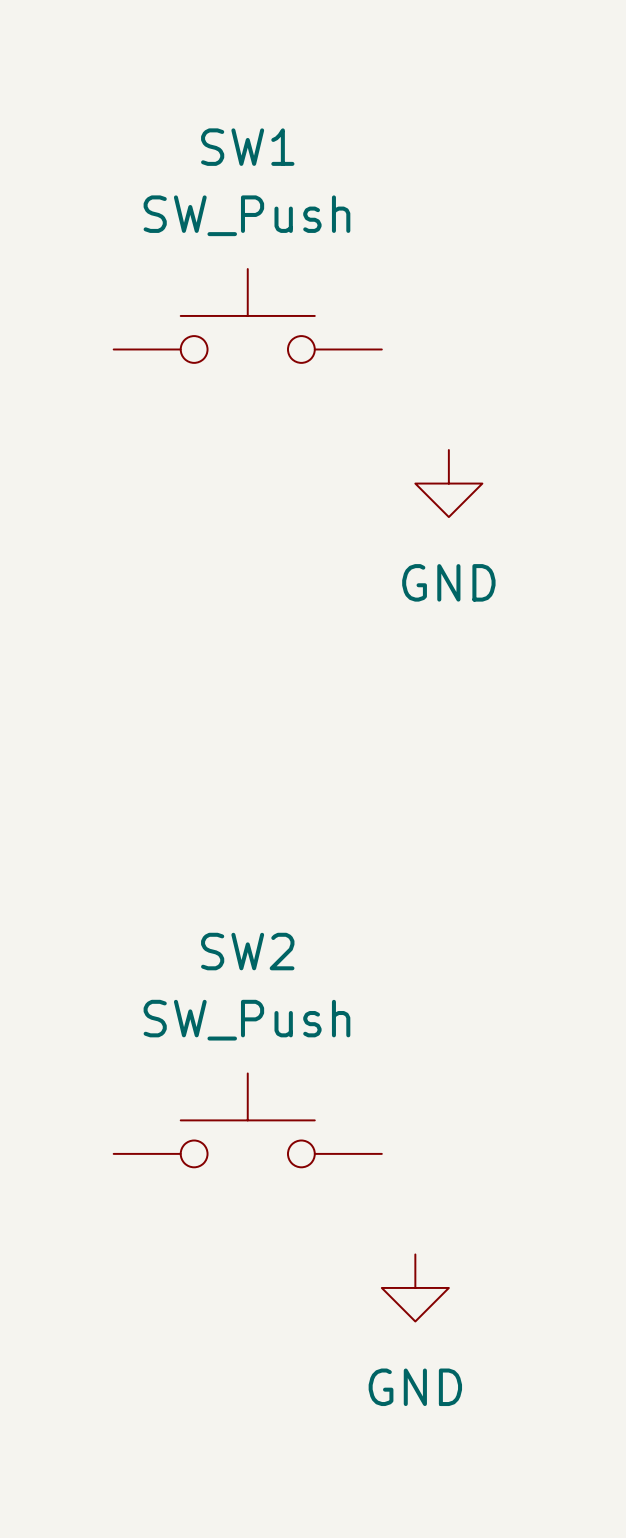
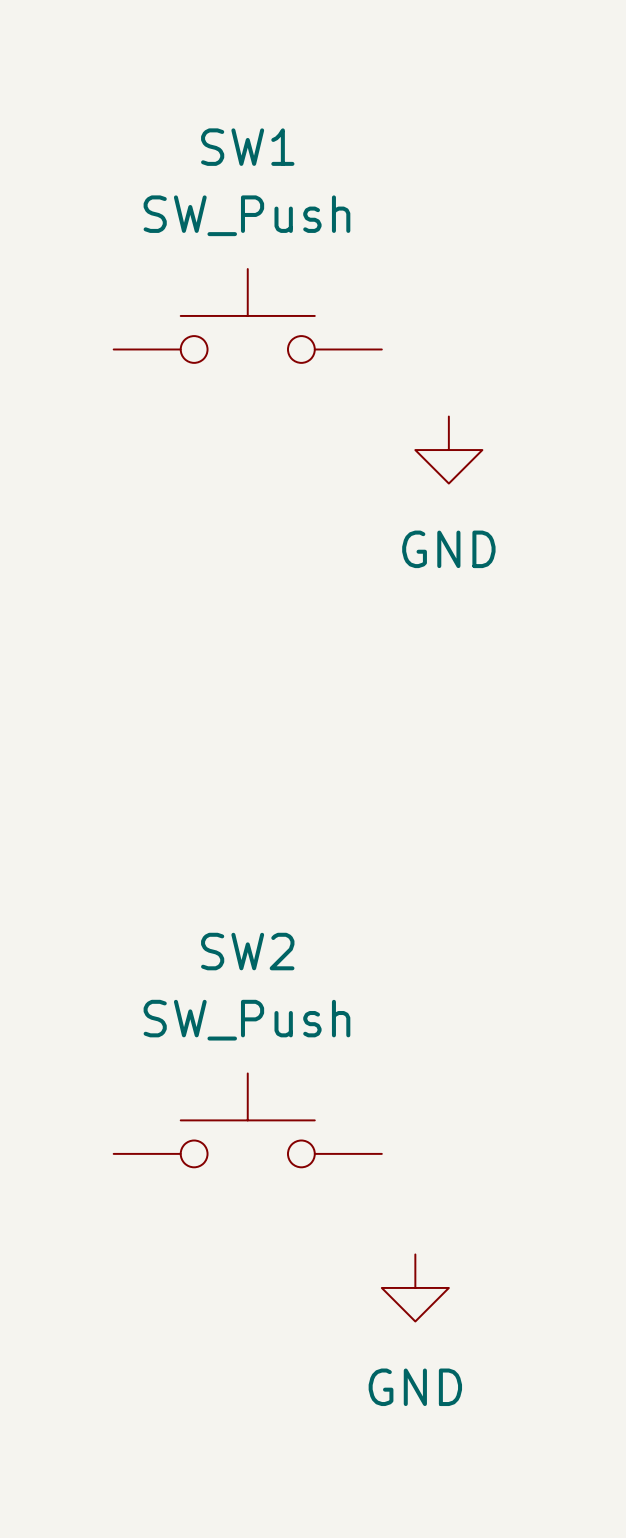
power symbol position: GND (448, 483) -> GND (448, 450)

